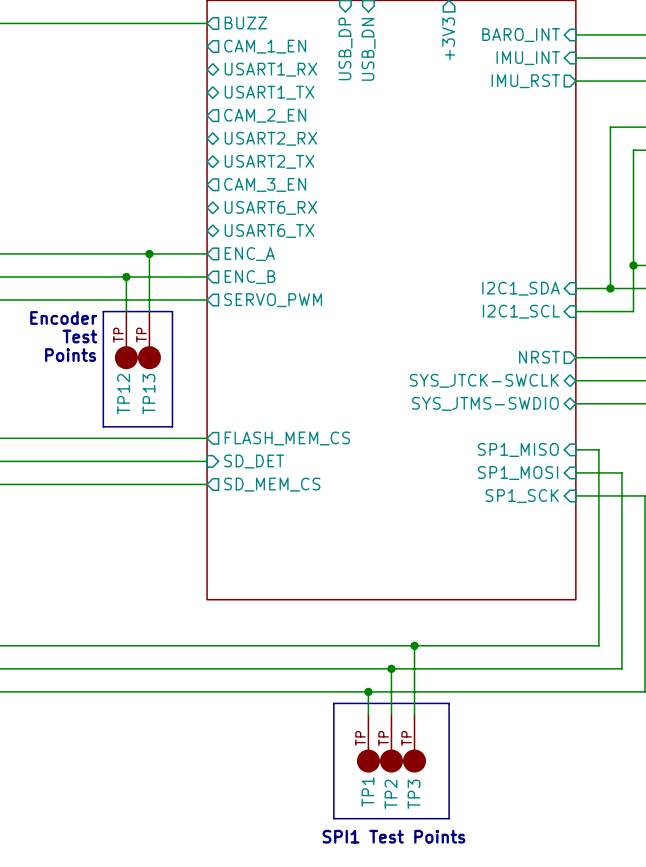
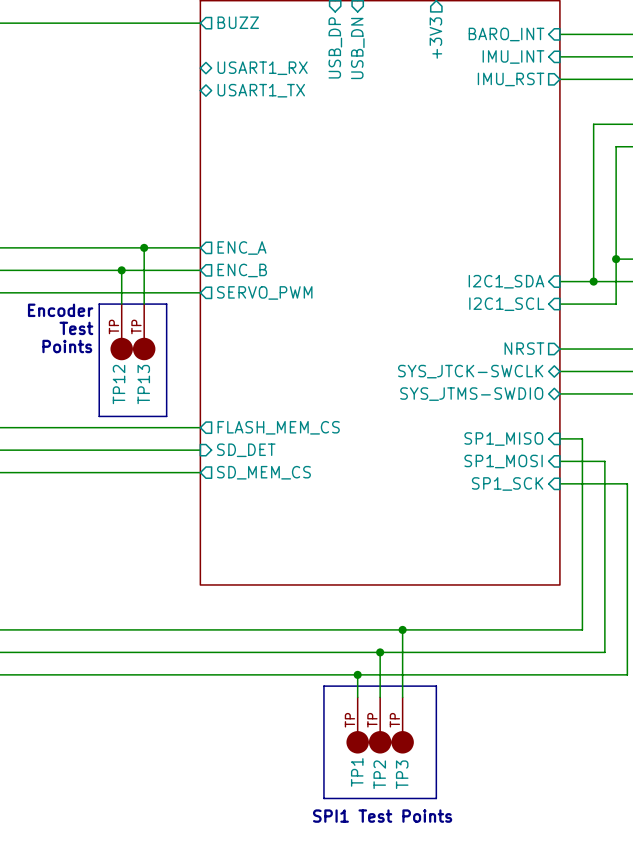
sheet pin: CAM_1_EN (265, 46) -> none
sheet pin: CAM_2_EN (265, 115) -> none
sheet pin: USART2_RX (270, 138) -> none
sheet pin: USART2_TX (269, 161) -> none
sheet pin: CAM_3_EN (265, 184) -> none
sheet pin: USART6_RX (270, 207) -> none
sheet pin: USART6_TX (269, 231) -> none

